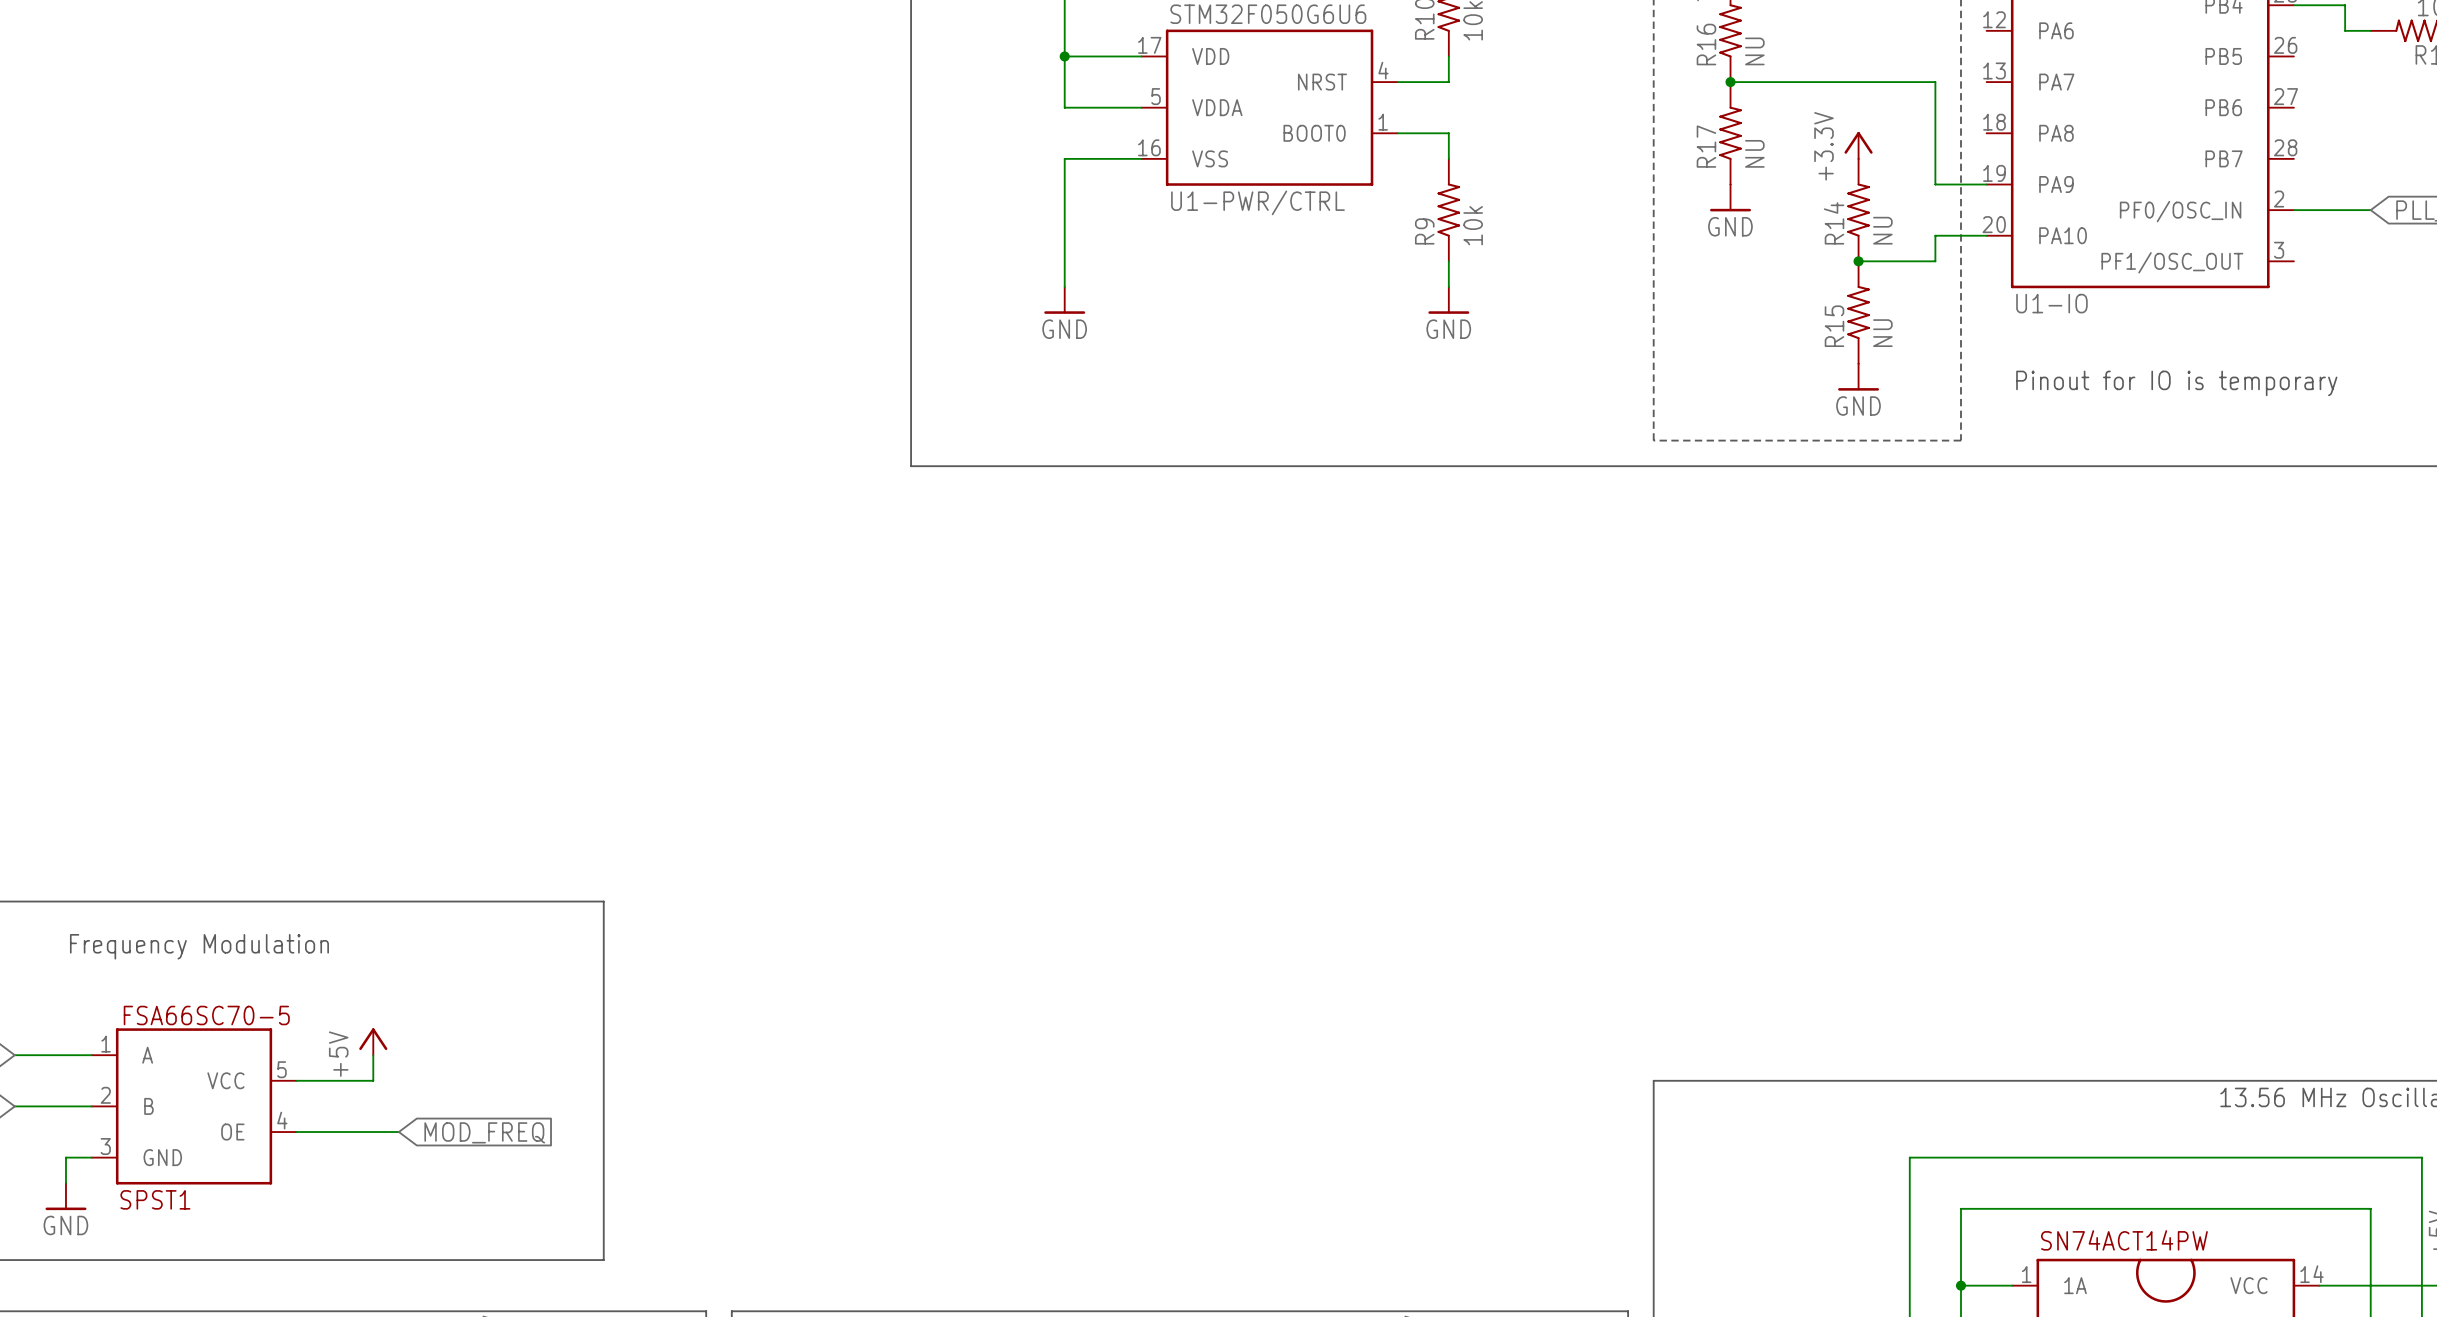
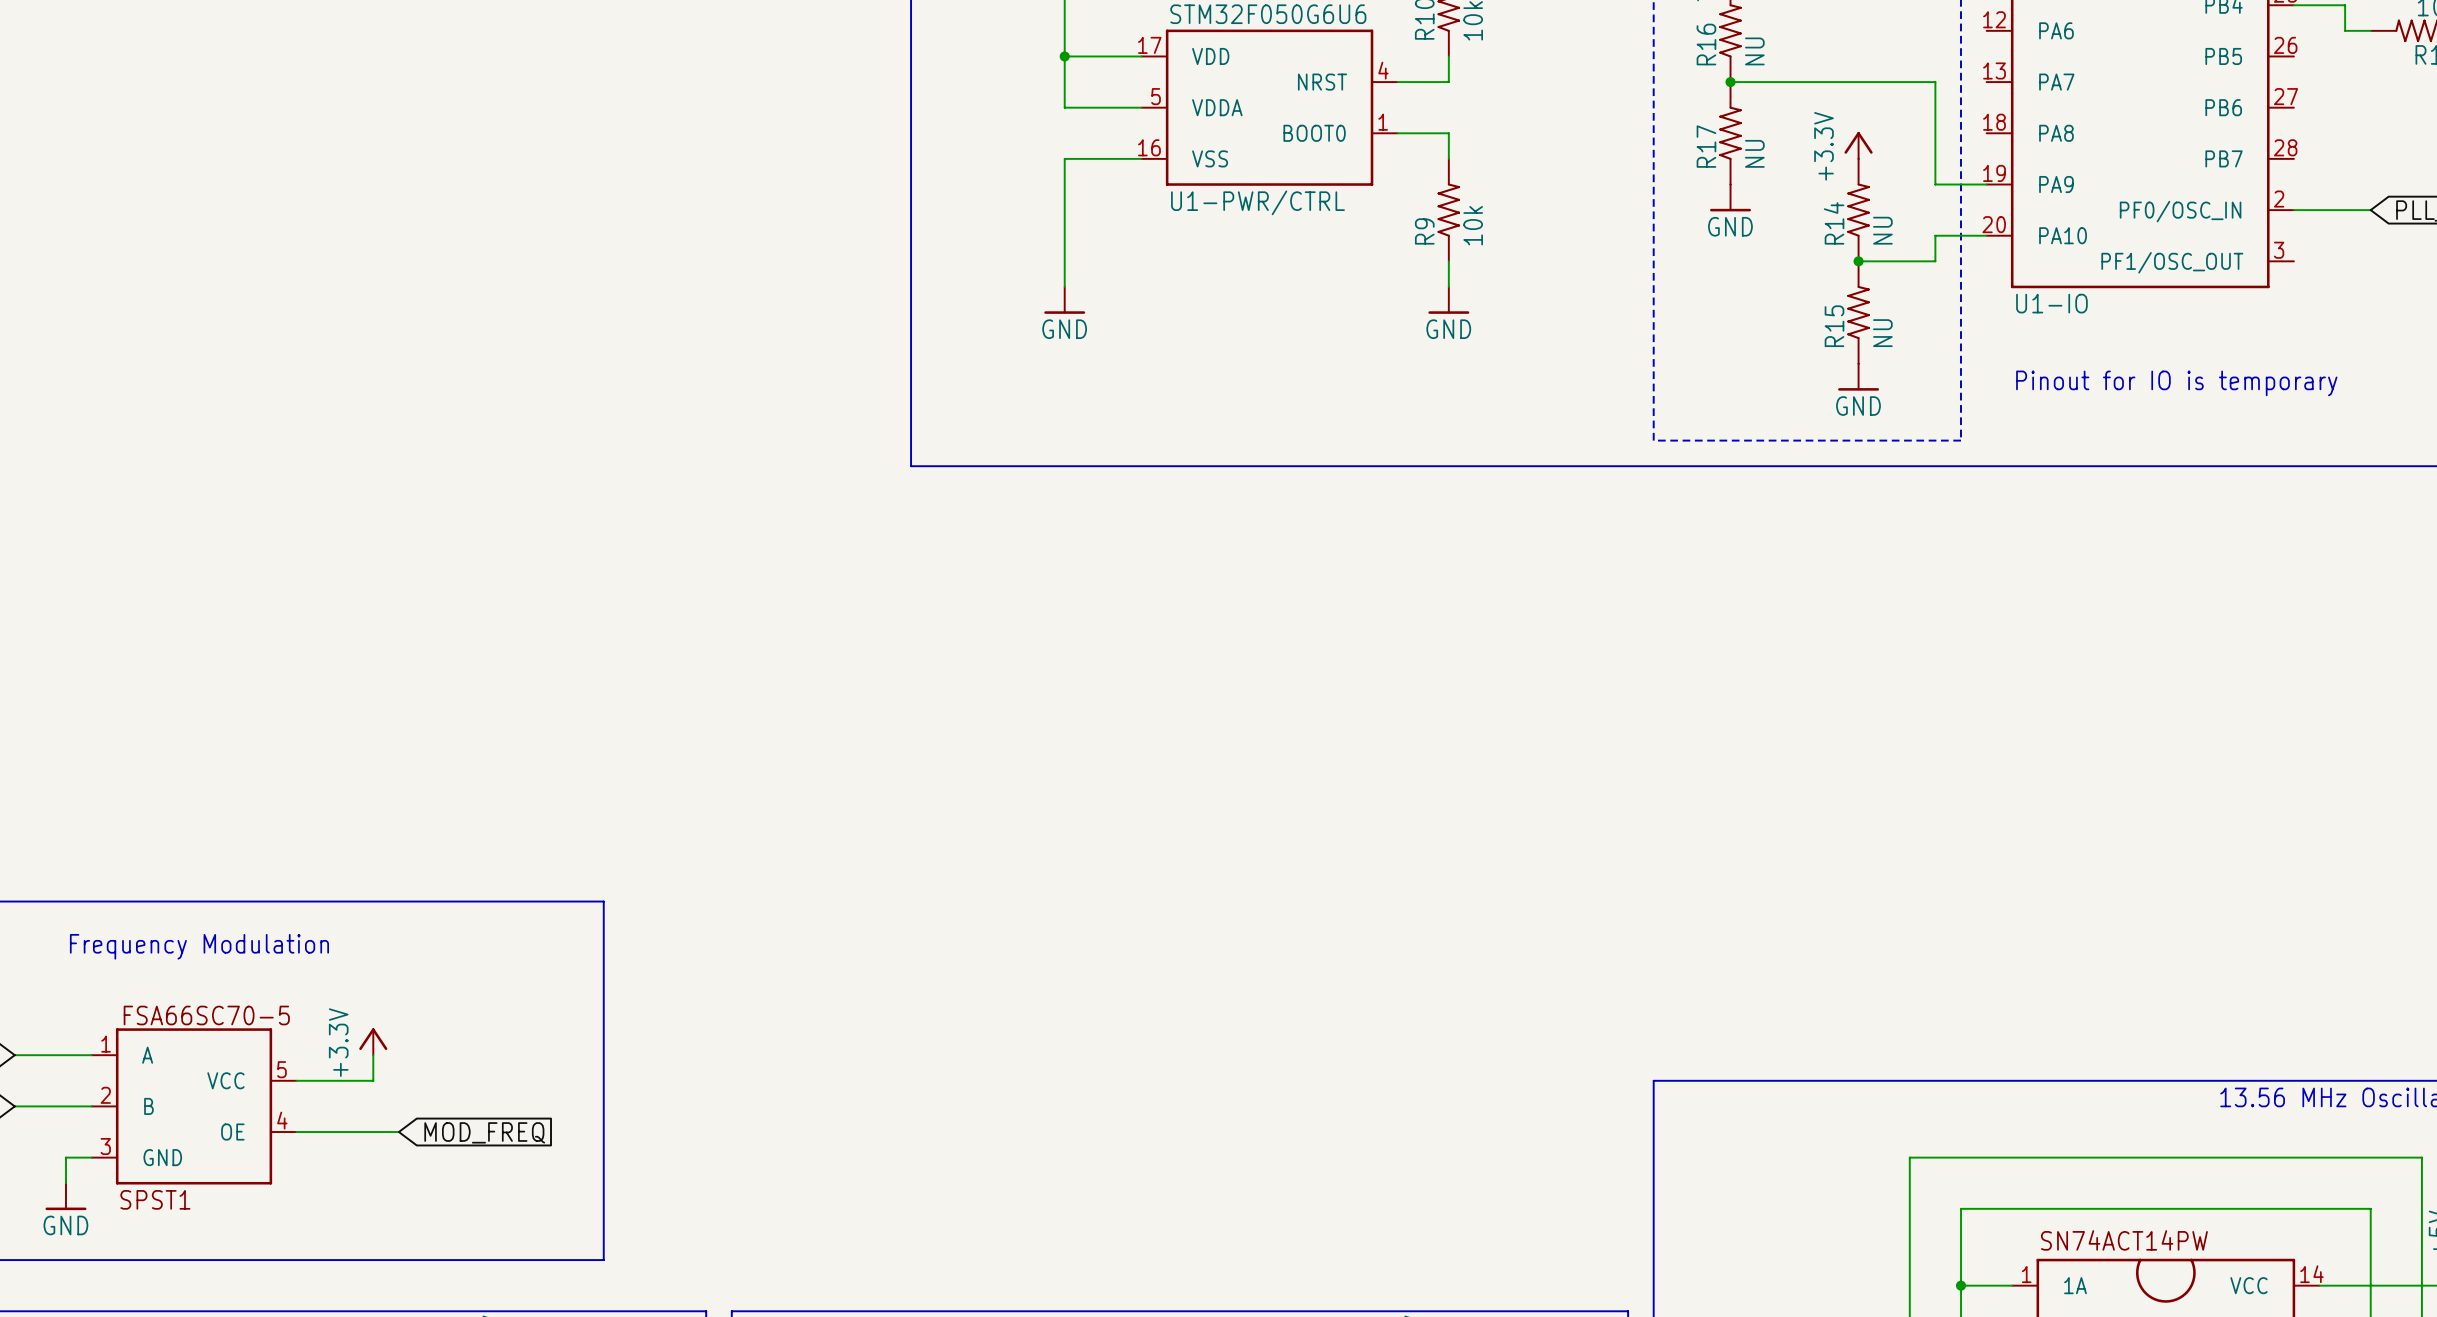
power symbol: +5V (373, 1041) -> +3.3V (373, 1041)

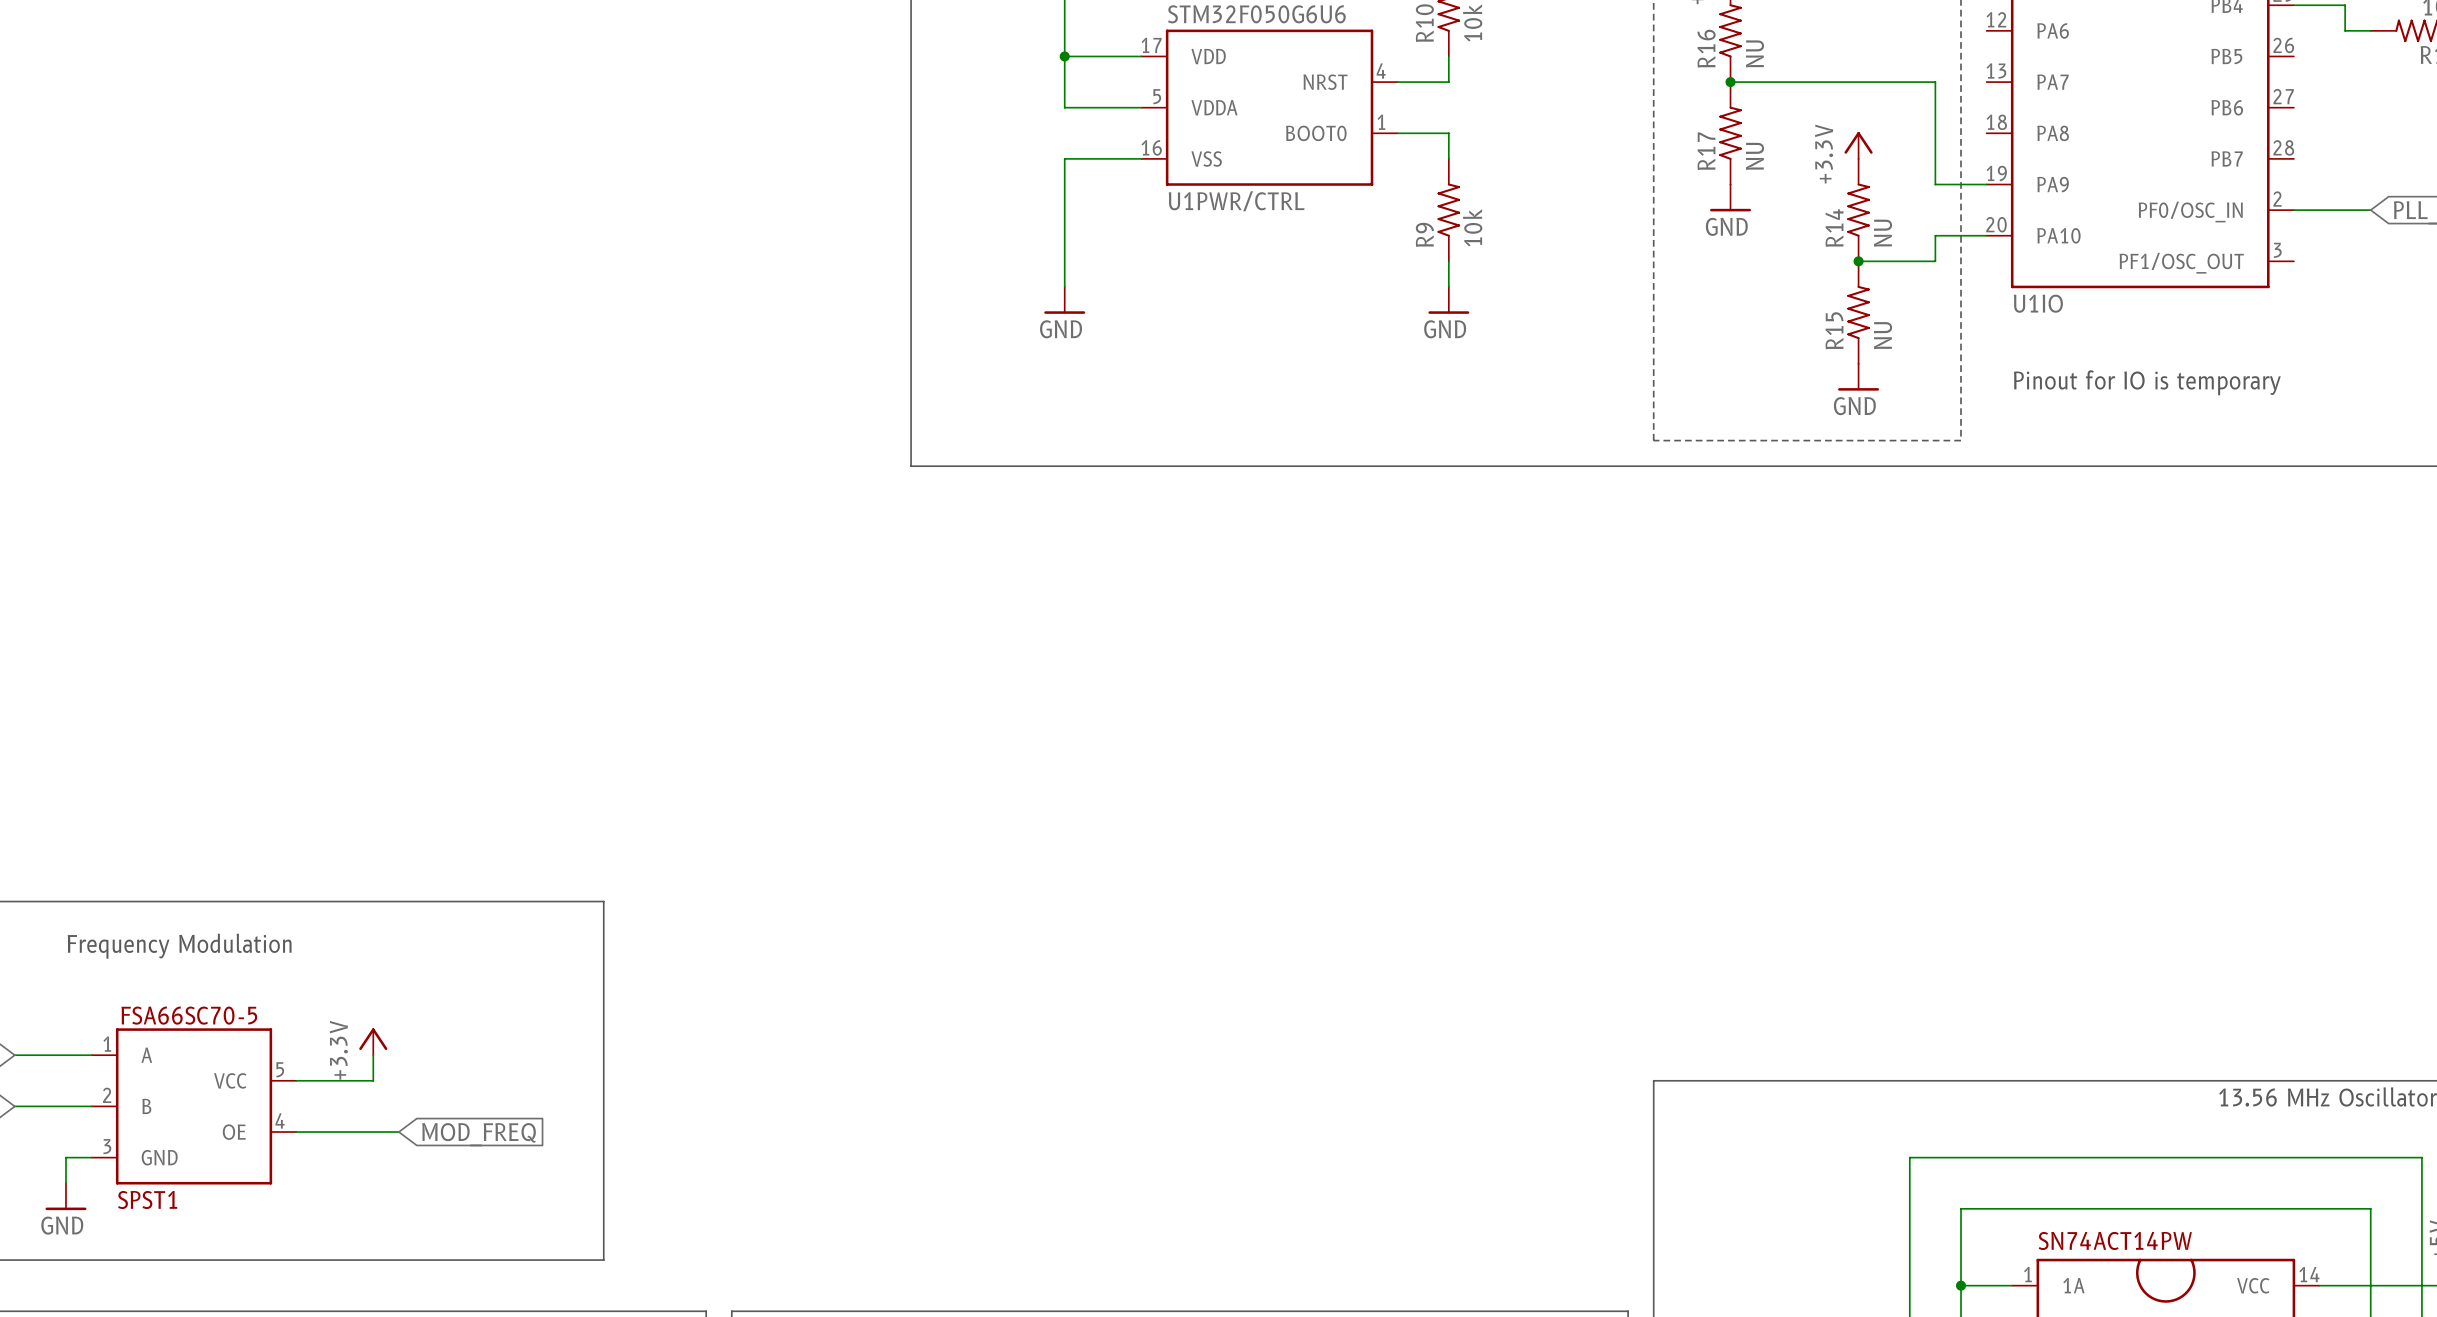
U1-PWR/CTRL name: U1-PWR/CTRL (1257, 202) -> U1PWR/CTRL (1236, 201)
U1-IO name: U1-IO (2051, 303) -> U1IO (2038, 303)

